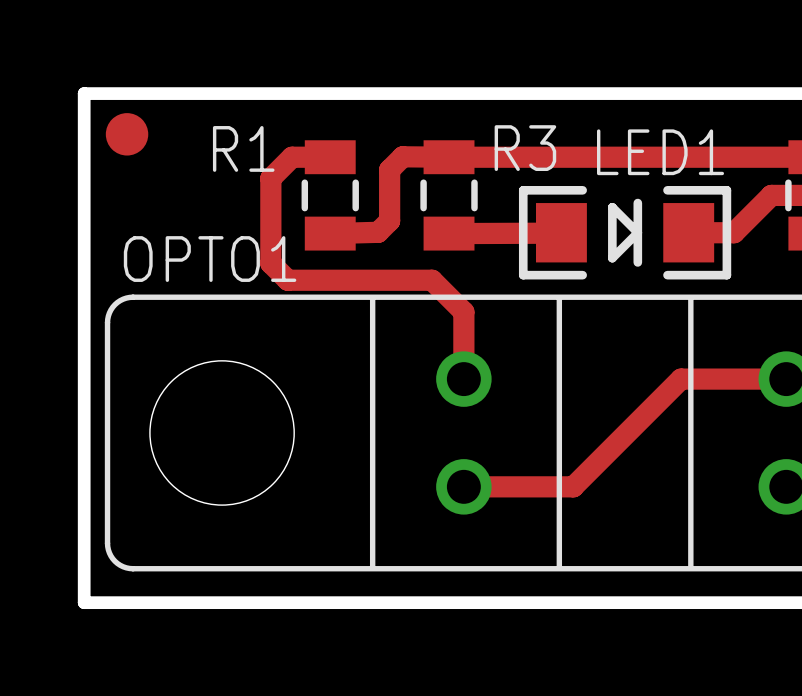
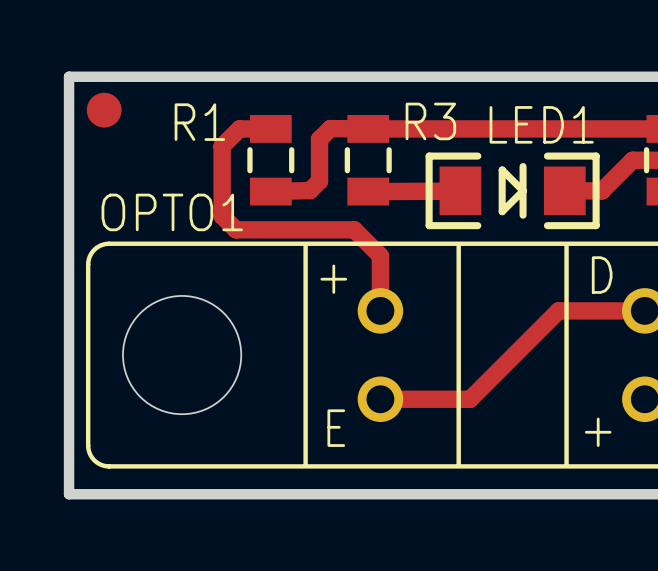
text: none -> D (602, 275)
text: none -> + (333, 279)
text: none -> E (336, 428)
text: none -> + (598, 432)

